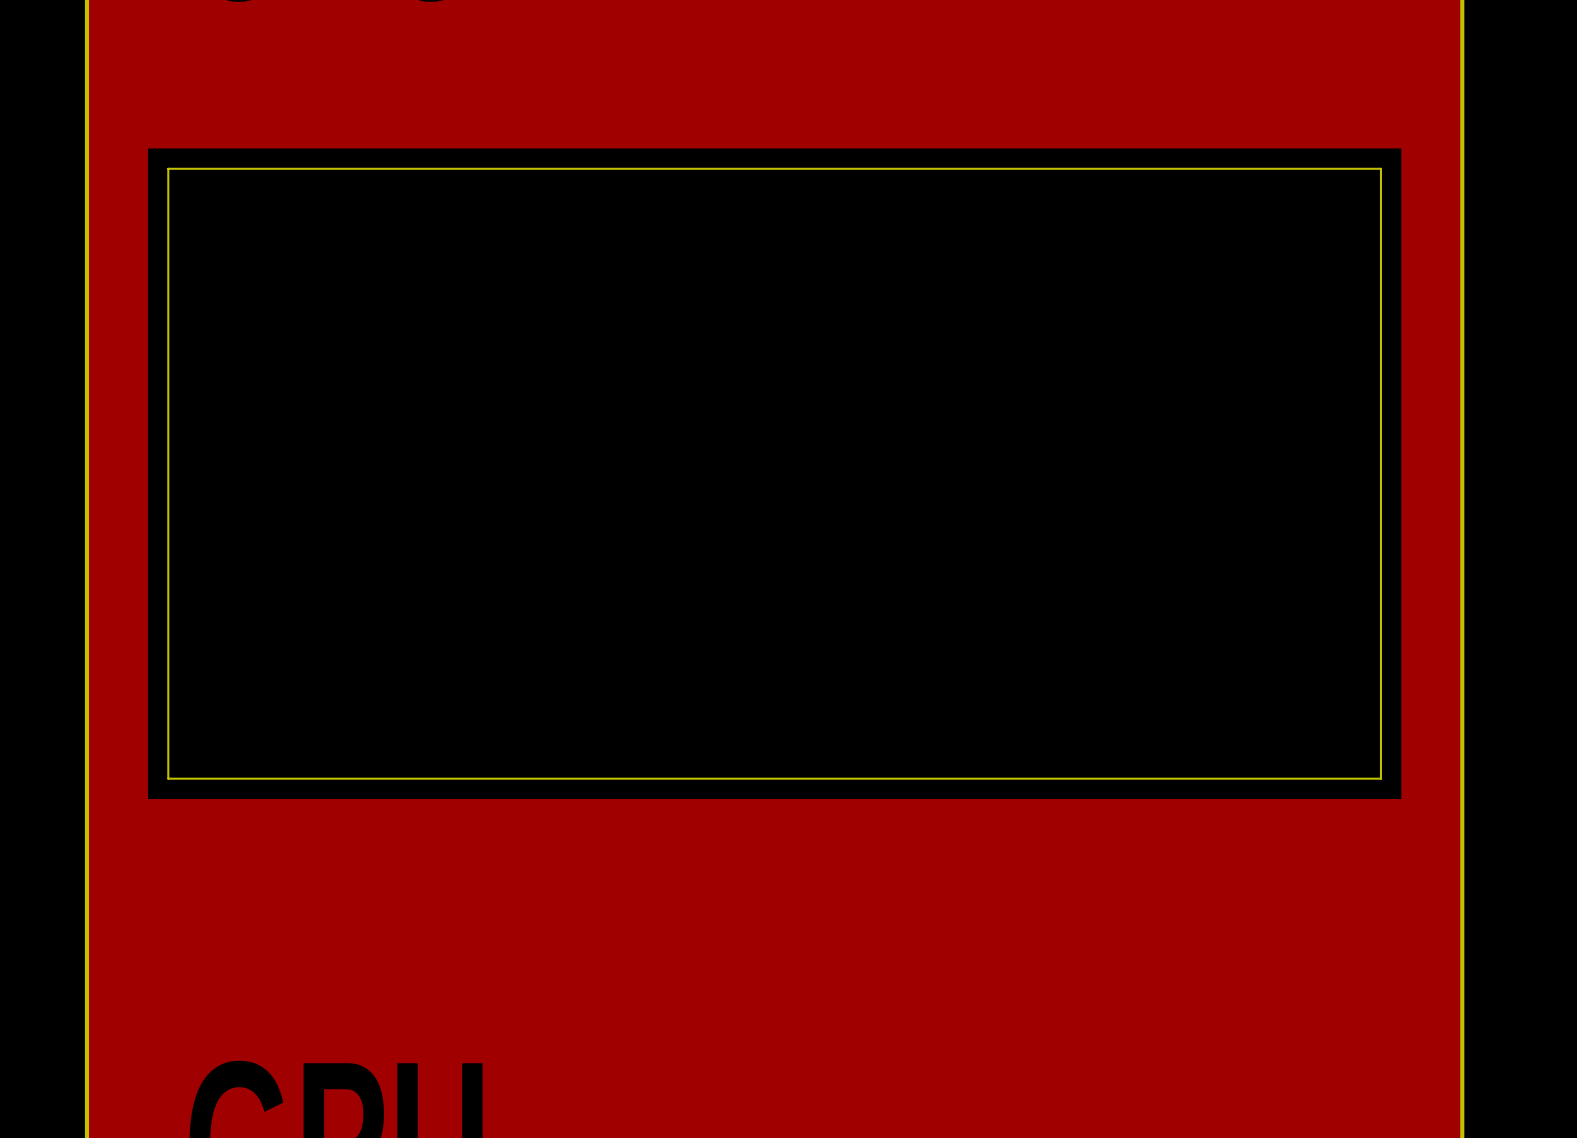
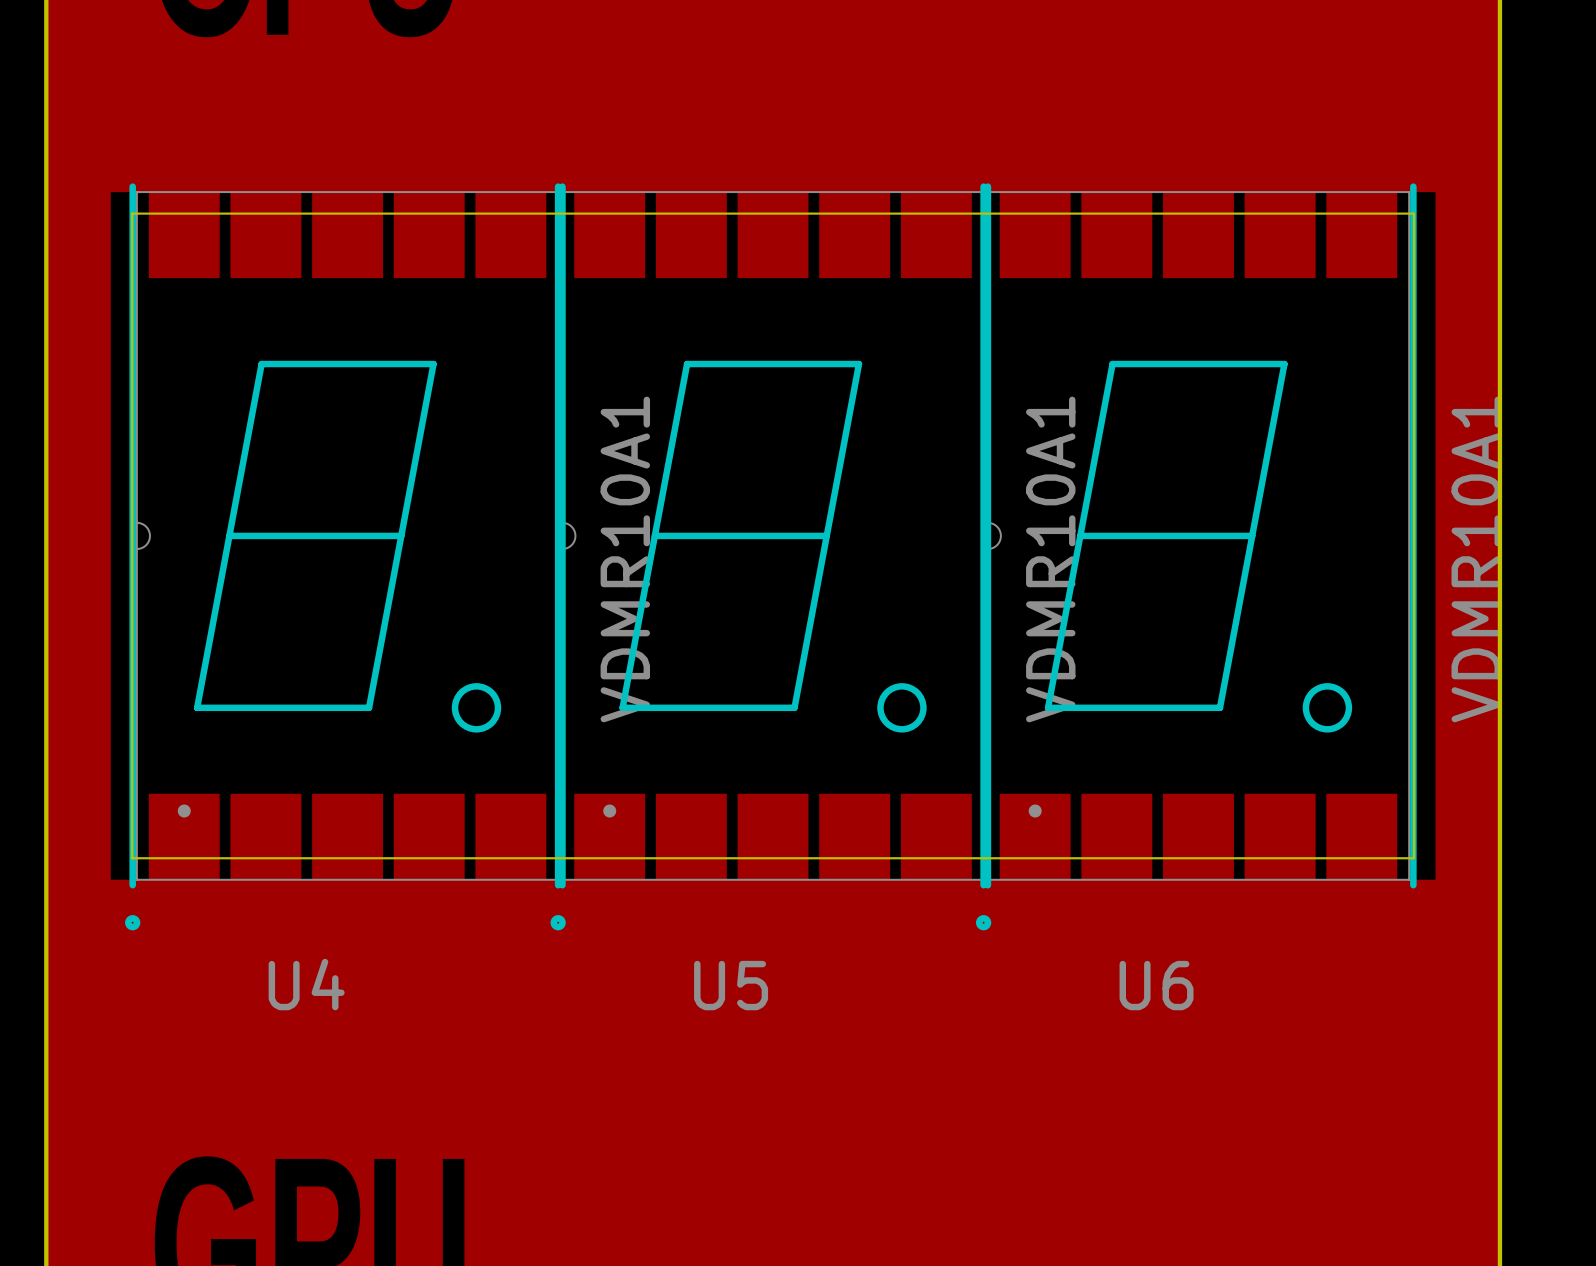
U4: none -> VDMR10A1 (345, 539)
U5: none -> VDMR10A1 (770, 539)
U6: none -> VDMR10A1 (1196, 539)

